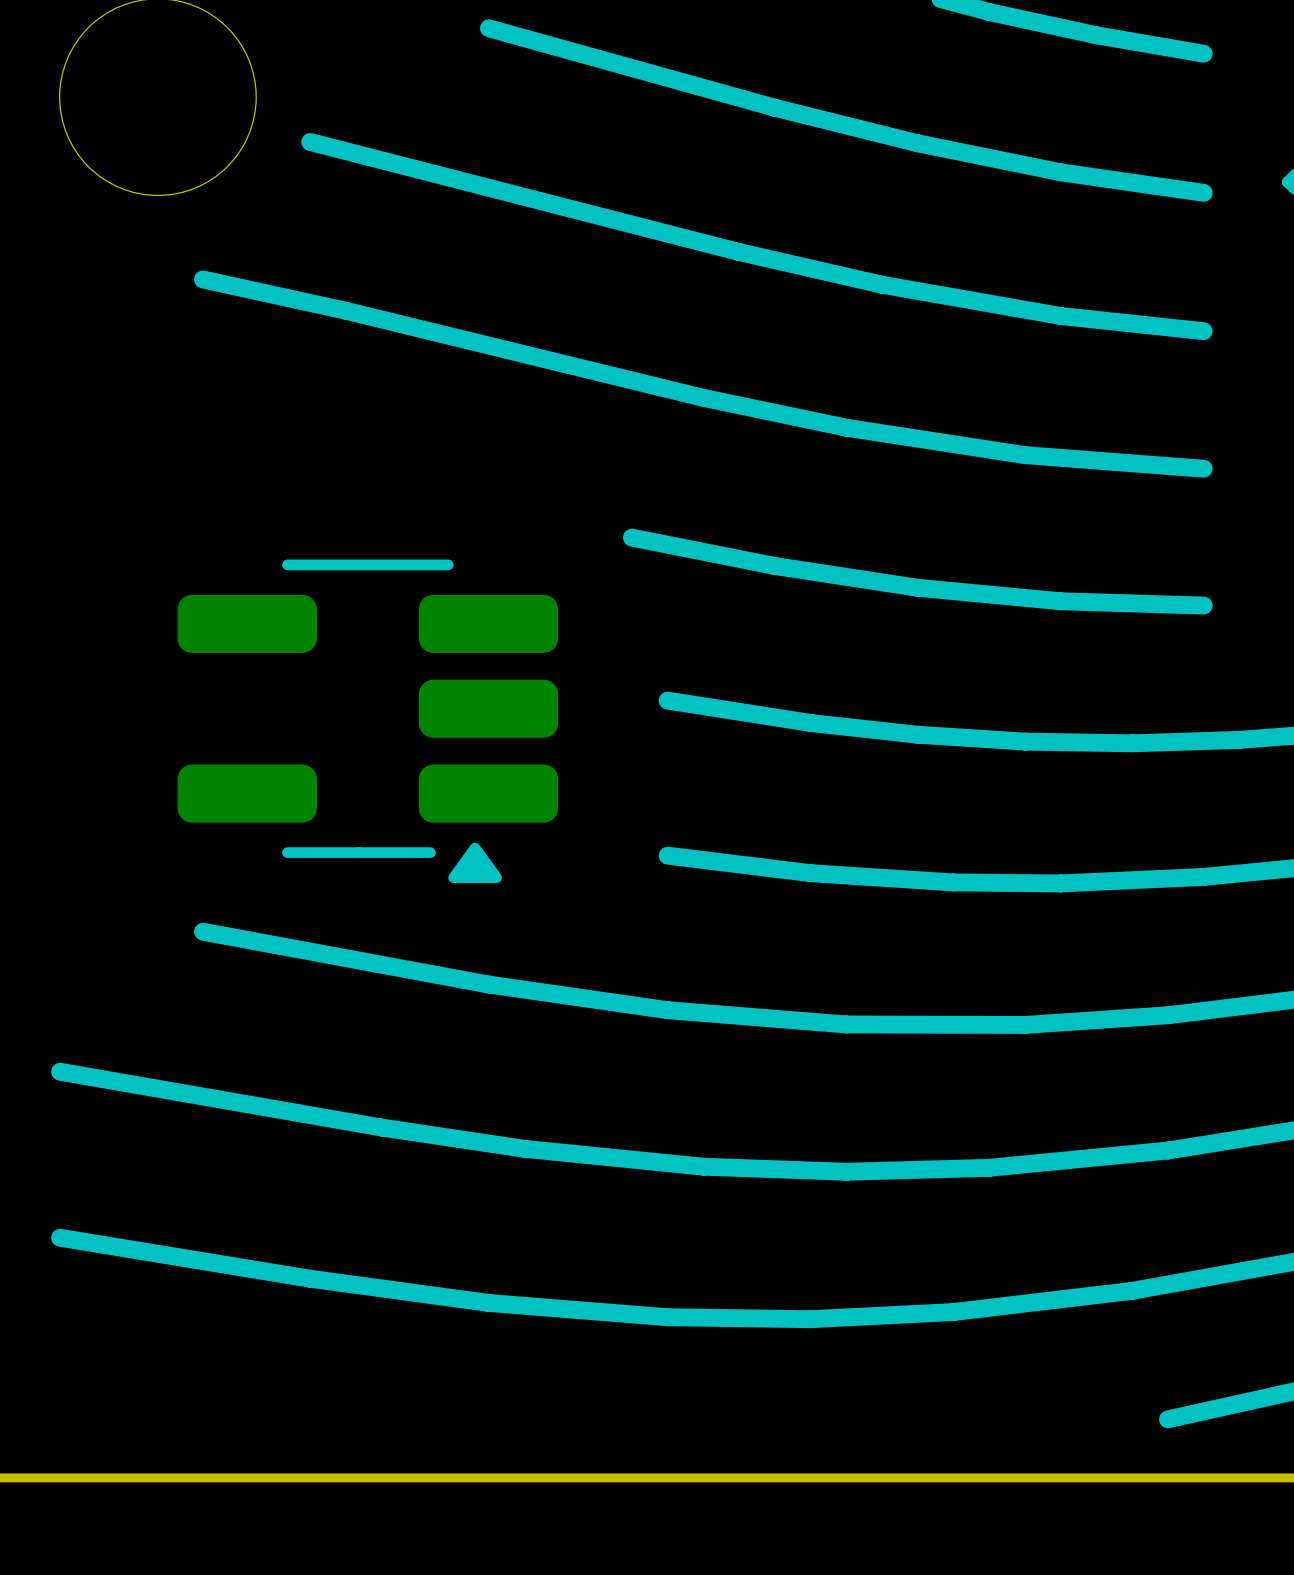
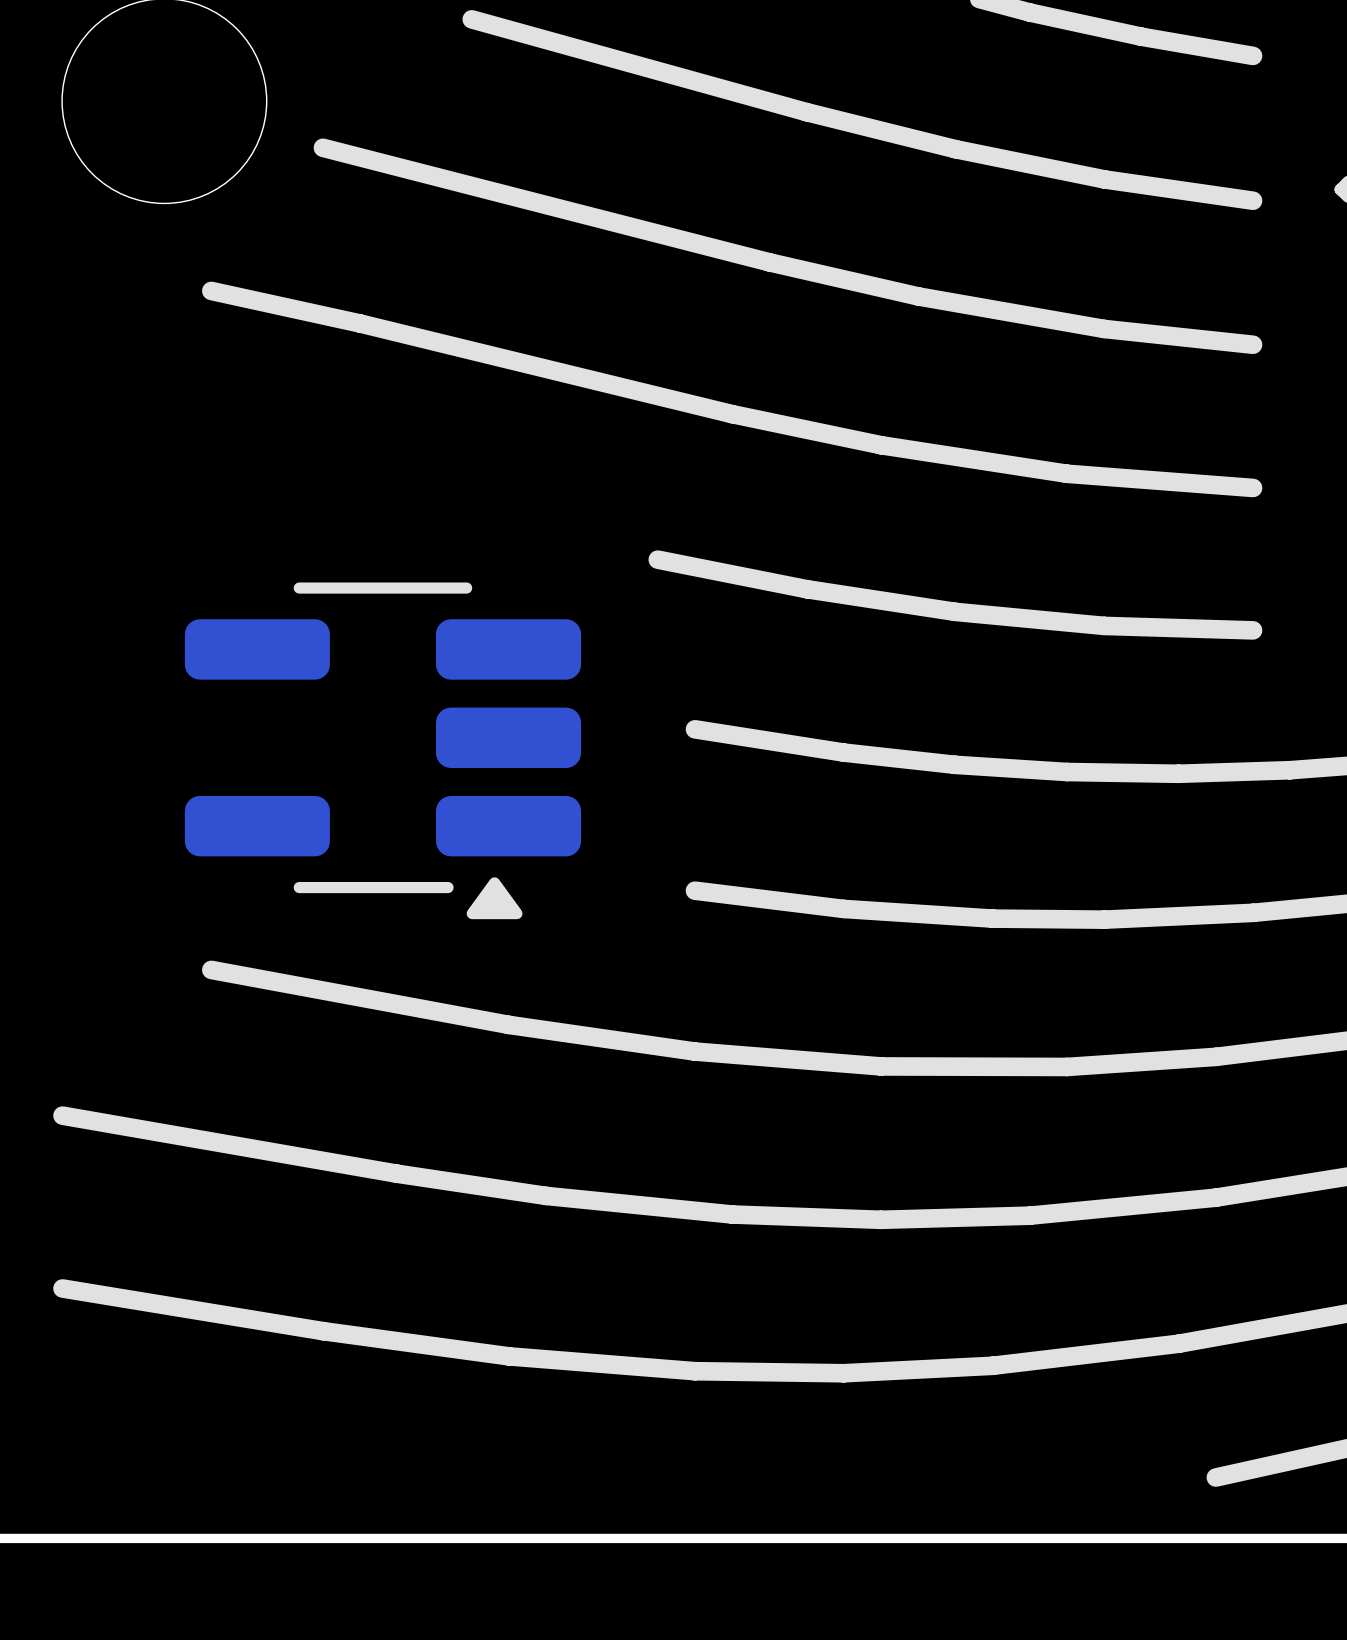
line: (488, 28) (774, 107) -> (471, 19) (806, 112)

